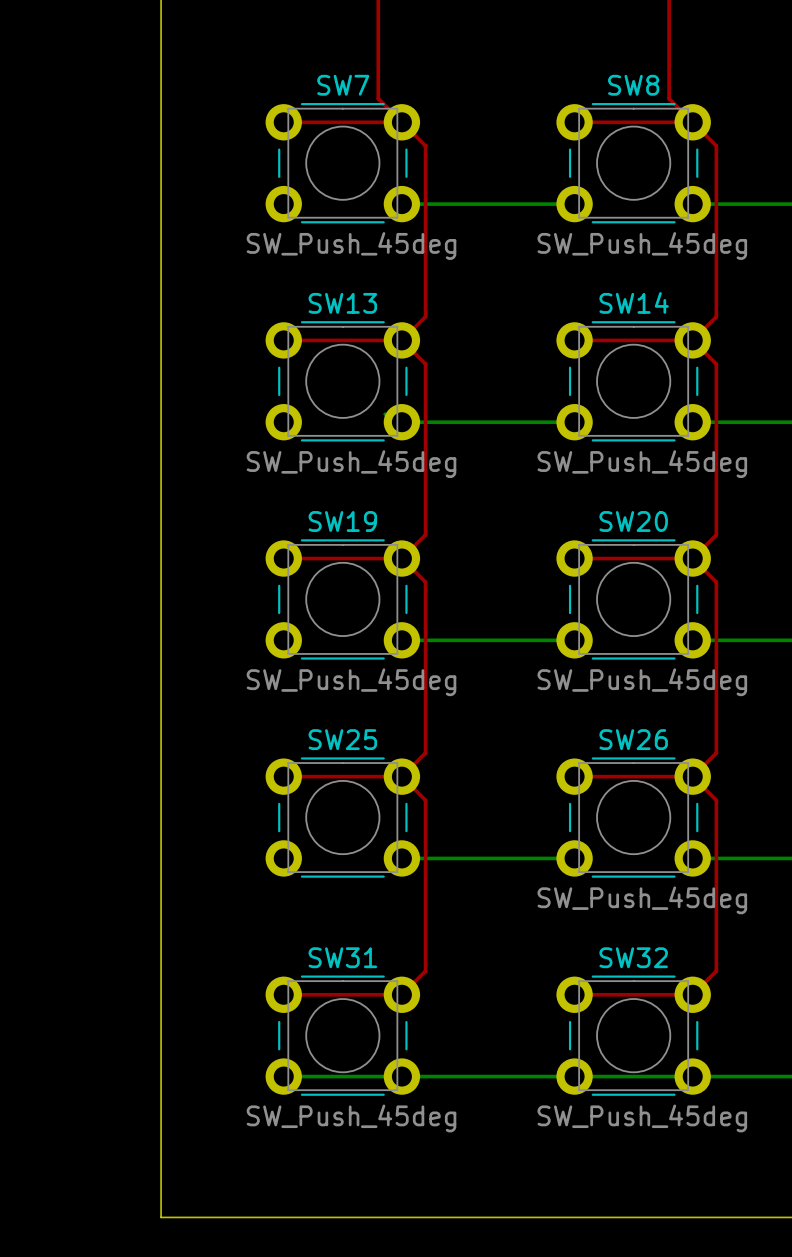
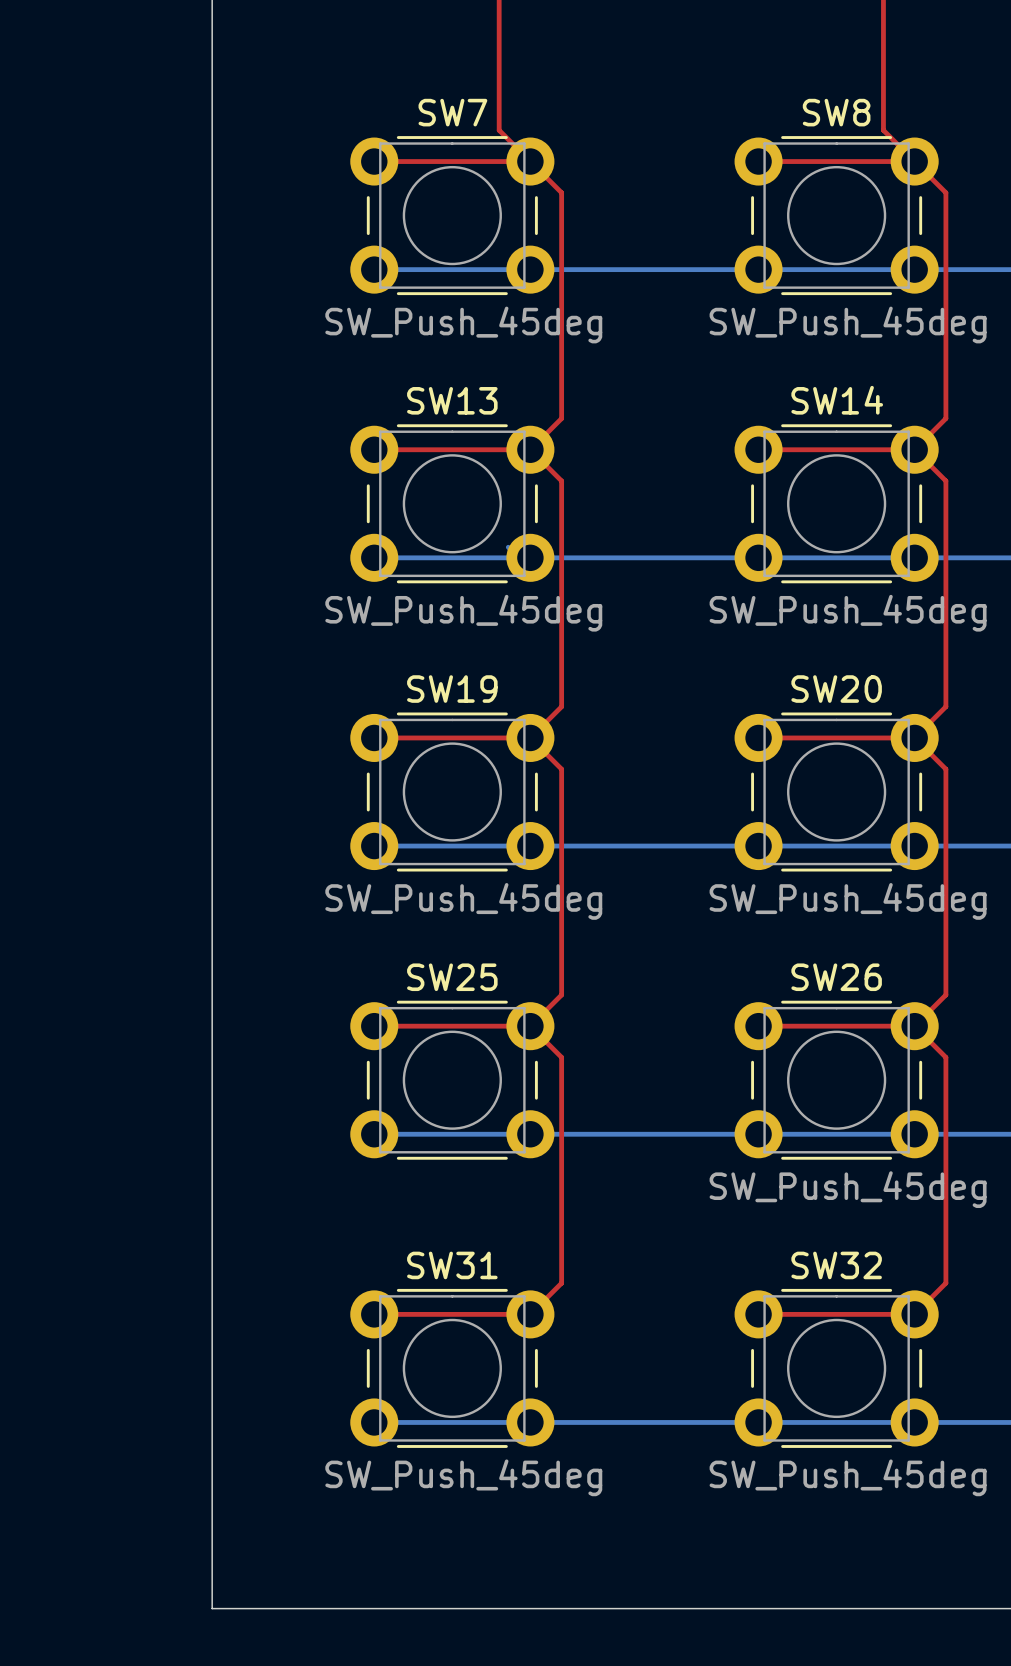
bottom track: none -> (374, 269) (530, 269)
bottom track: none -> (758, 269) (914, 269)
bottom track: none -> (374, 557) (518, 557)
bottom track: none -> (758, 557) (914, 557)
bottom track: none -> (374, 846) (530, 846)
bottom track: none -> (758, 846) (914, 846)
bottom track: none -> (374, 1134) (530, 1134)
bottom track: none -> (758, 1134) (914, 1134)

